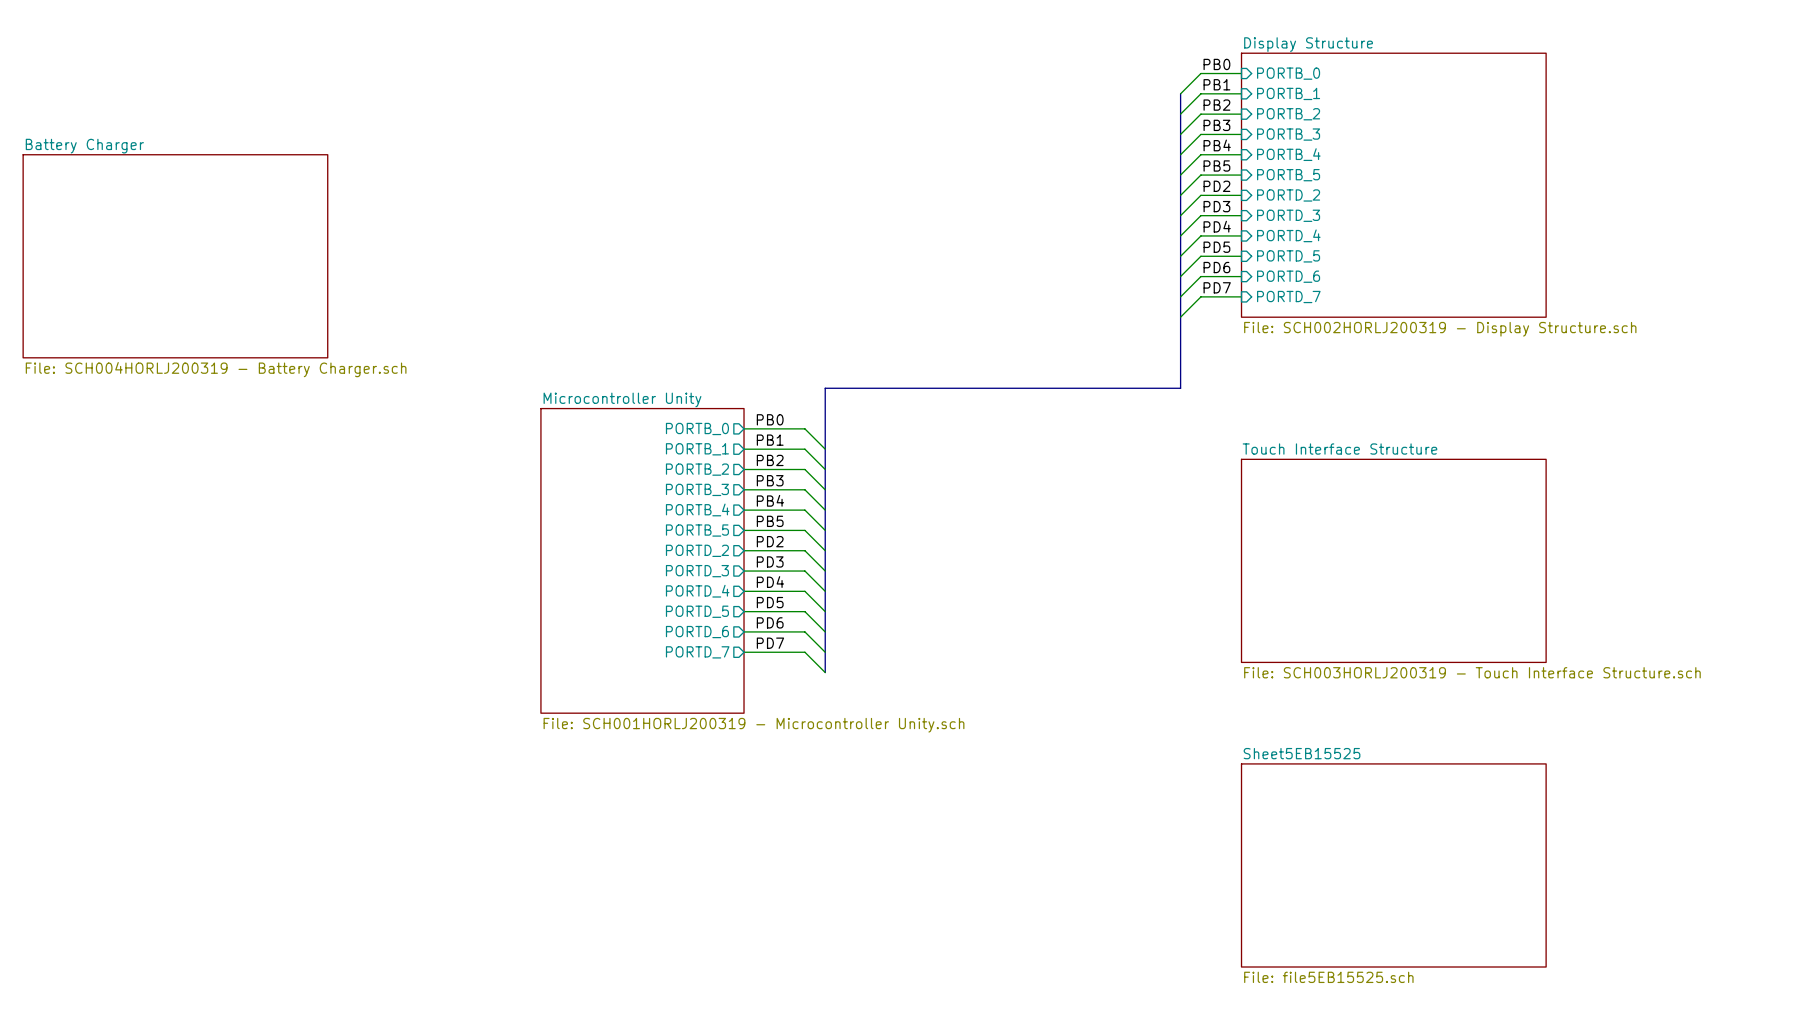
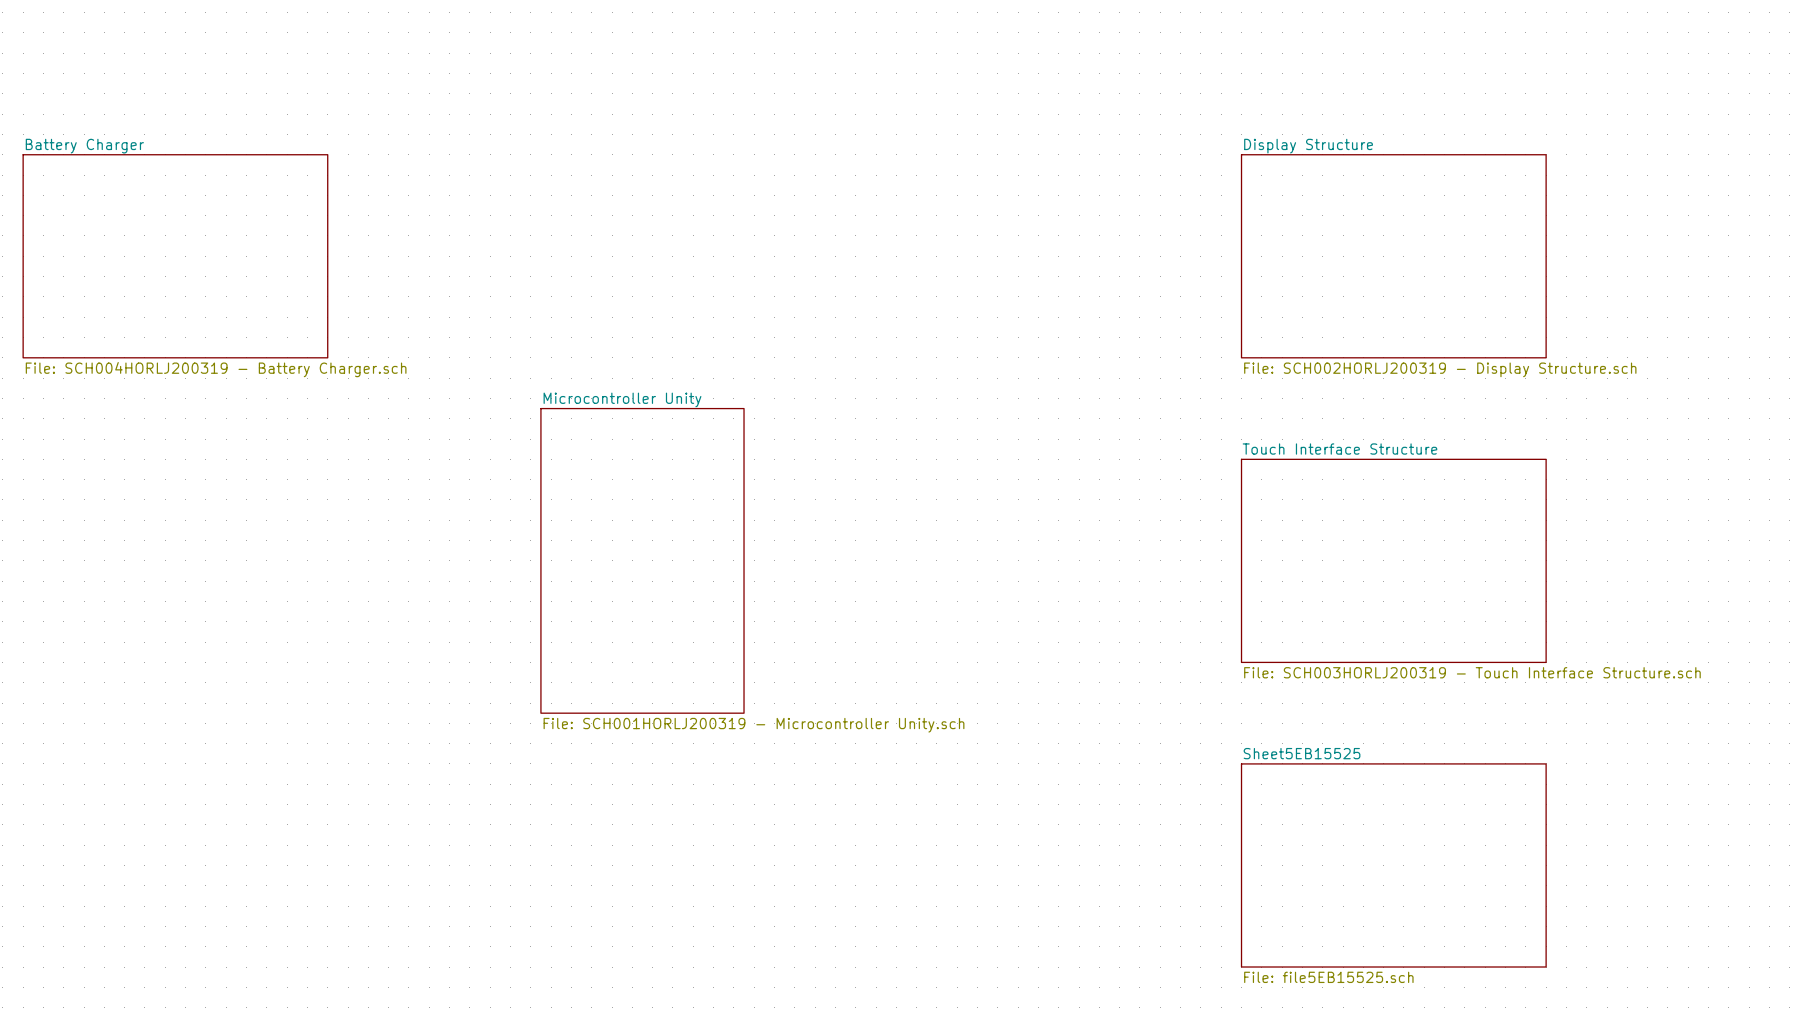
label: PB0 (1216, 64) -> none
wire: (1241, 73) (1200, 73) (1180, 93) -> none
sheet pin: PORTB_0 (1288, 73) -> none
label: PB1 (1216, 84) -> none
bus: (1180, 93) (1180, 388) (825, 388) (825, 672) -> none
wire: (1241, 93) (1200, 93) (1180, 114) -> none
sheet pin: PORTB_1 (1288, 93) -> none
label: PB2 (1216, 105) -> none
wire: (1241, 114) (1200, 114) (1180, 134) -> none
sheet pin: PORTB_2 (1288, 114) -> none
label: PB3 (1216, 125) -> none
wire: (1241, 134) (1200, 134) (1180, 154) -> none
sheet pin: PORTB_3 (1288, 134) -> none
label: PB4 (1217, 145) -> none
wire: (1241, 154) (1200, 154) (1180, 175) -> none
sheet pin: PORTB_4 (1288, 154) -> none
label: PB5 (1216, 165) -> none
wire: (1241, 175) (1200, 175) (1180, 195) -> none
sheet pin: PORTB_5 (1288, 175) -> none
sheet Display Structure: File: SCH002HORLJ200319 - Display Structure.sch (1393, 185) -> none
label: PD2 (1216, 186) -> none
wire: (1241, 195) (1200, 195) (1180, 215) -> none
sheet pin: PORTD_2 (1288, 195) -> none
label: PD3 (1216, 206) -> none
wire: (1241, 215) (1200, 215) (1180, 235) -> none
sheet pin: PORTD_3 (1288, 215) -> none
label: PD4 (1217, 226) -> none
wire: (1241, 235) (1200, 235) (1180, 256) -> none
sheet pin: PORTD_4 (1288, 235) -> none
label: PD5 (1216, 247) -> none
wire: (1241, 256) (1200, 256) (1180, 276) -> none
sheet pin: PORTD_5 (1288, 256) -> none
sheet Display Structure: none -> File: SCH002HORLJ200319 - Display Structure.sch (1393, 256)
label: PD6 (1216, 267) -> none
wire: (1241, 276) (1200, 276) (1180, 296) -> none
sheet pin: PORTD_6 (1288, 276) -> none
label: PD7 (1217, 287) -> none
wire: (1241, 296) (1200, 296) (1180, 317) -> none
sheet pin: PORTD_7 (1288, 296) -> none
label: PB0 (770, 419) -> none
sheet pin: PORTB_0 (697, 428) -> none
wire: (744, 428) (804, 428) (825, 449) -> none
label: PB1 (770, 440) -> none
sheet pin: PORTB_1 (697, 449) -> none
wire: (744, 449) (804, 449) (825, 469) -> none
label: PB2 (770, 460) -> none
sheet pin: PORTB_2 (697, 469) -> none
wire: (744, 469) (804, 469) (825, 489) -> none
label: PB3 (770, 480) -> none
sheet pin: PORTB_3 (697, 489) -> none
wire: (744, 489) (804, 489) (825, 510) -> none
label: PB4 (770, 500) -> none
sheet pin: PORTB_4 (697, 509) -> none
wire: (744, 510) (804, 510) (825, 530) -> none
label: PB5 (770, 521) -> none
sheet pin: PORTB_5 (697, 530) -> none
wire: (744, 530) (804, 530) (825, 550) -> none
label: PD2 (770, 541) -> none
sheet pin: PORTD_2 (697, 550) -> none
wire: (744, 550) (804, 550) (825, 571) -> none
label: PD3 (770, 561) -> none
sheet pin: PORTD_3 (697, 571) -> none
wire: (744, 571) (804, 571) (825, 591) -> none
label: PD4 (770, 582) -> none
sheet pin: PORTD_4 (697, 591) -> none
wire: (744, 591) (804, 591) (825, 611) -> none
label: PD5 (770, 602) -> none
sheet pin: PORTD_5 (697, 611) -> none
wire: (744, 611) (804, 611) (825, 631) -> none
label: PD6 (770, 622) -> none
wire: (744, 631) (804, 631) (825, 652) -> none
sheet pin: PORTD_6 (697, 632) -> none
label: PD7 (770, 643) -> none
sheet pin: PORTD_7 (697, 652) -> none
wire: (744, 652) (804, 652) (825, 672) -> none

